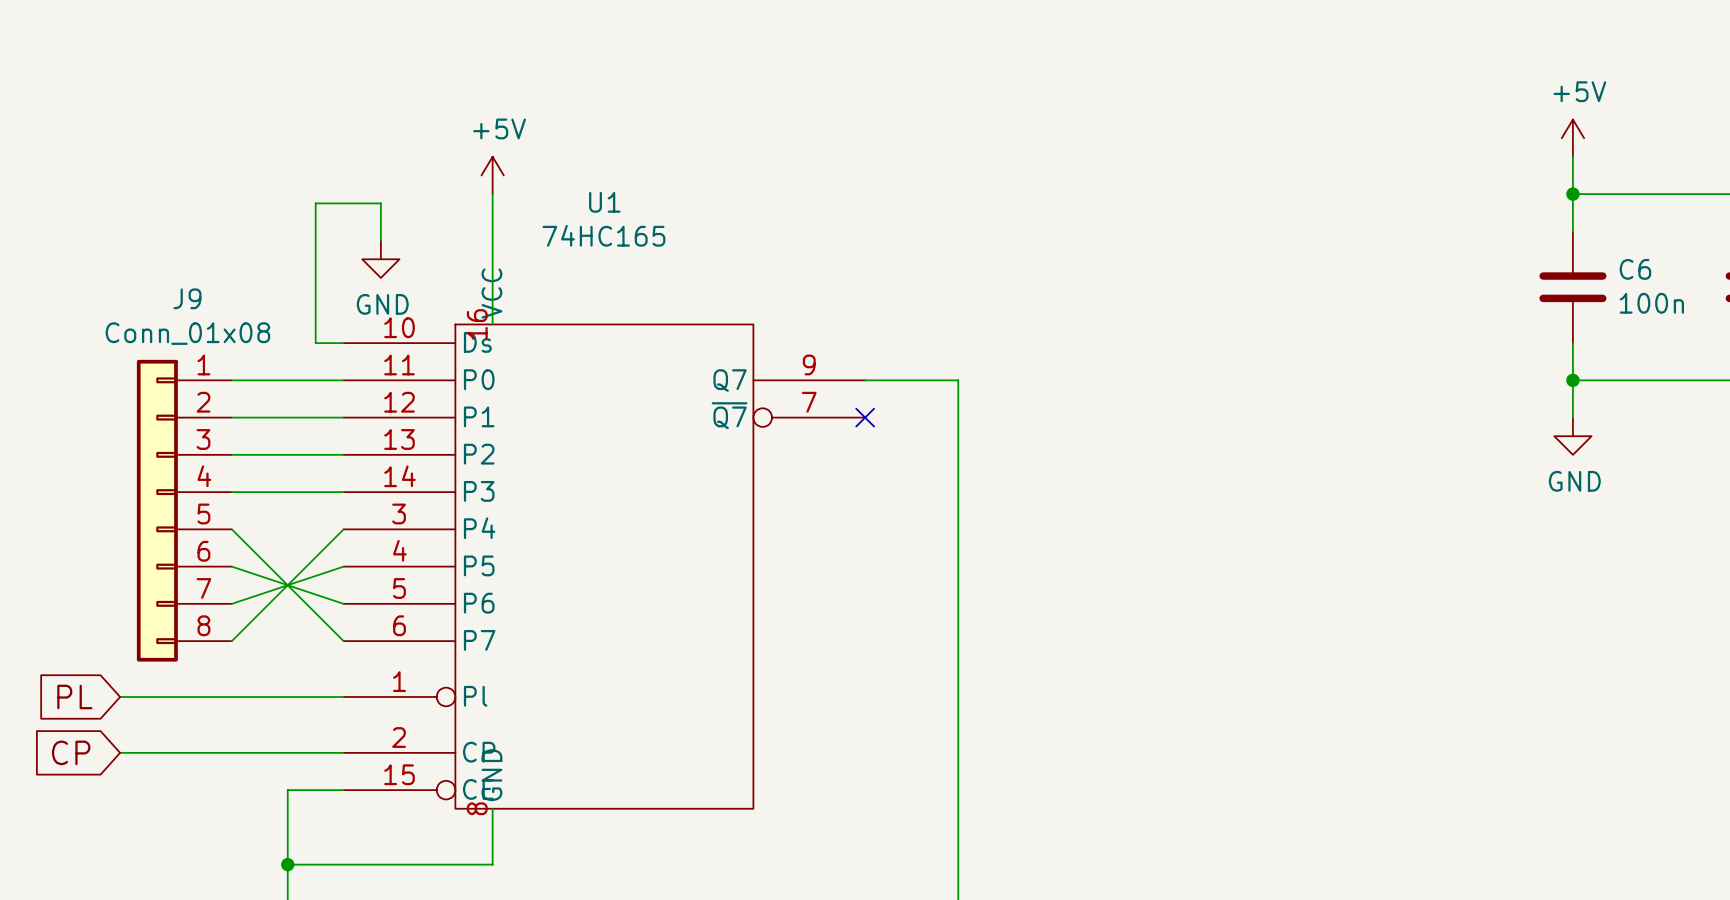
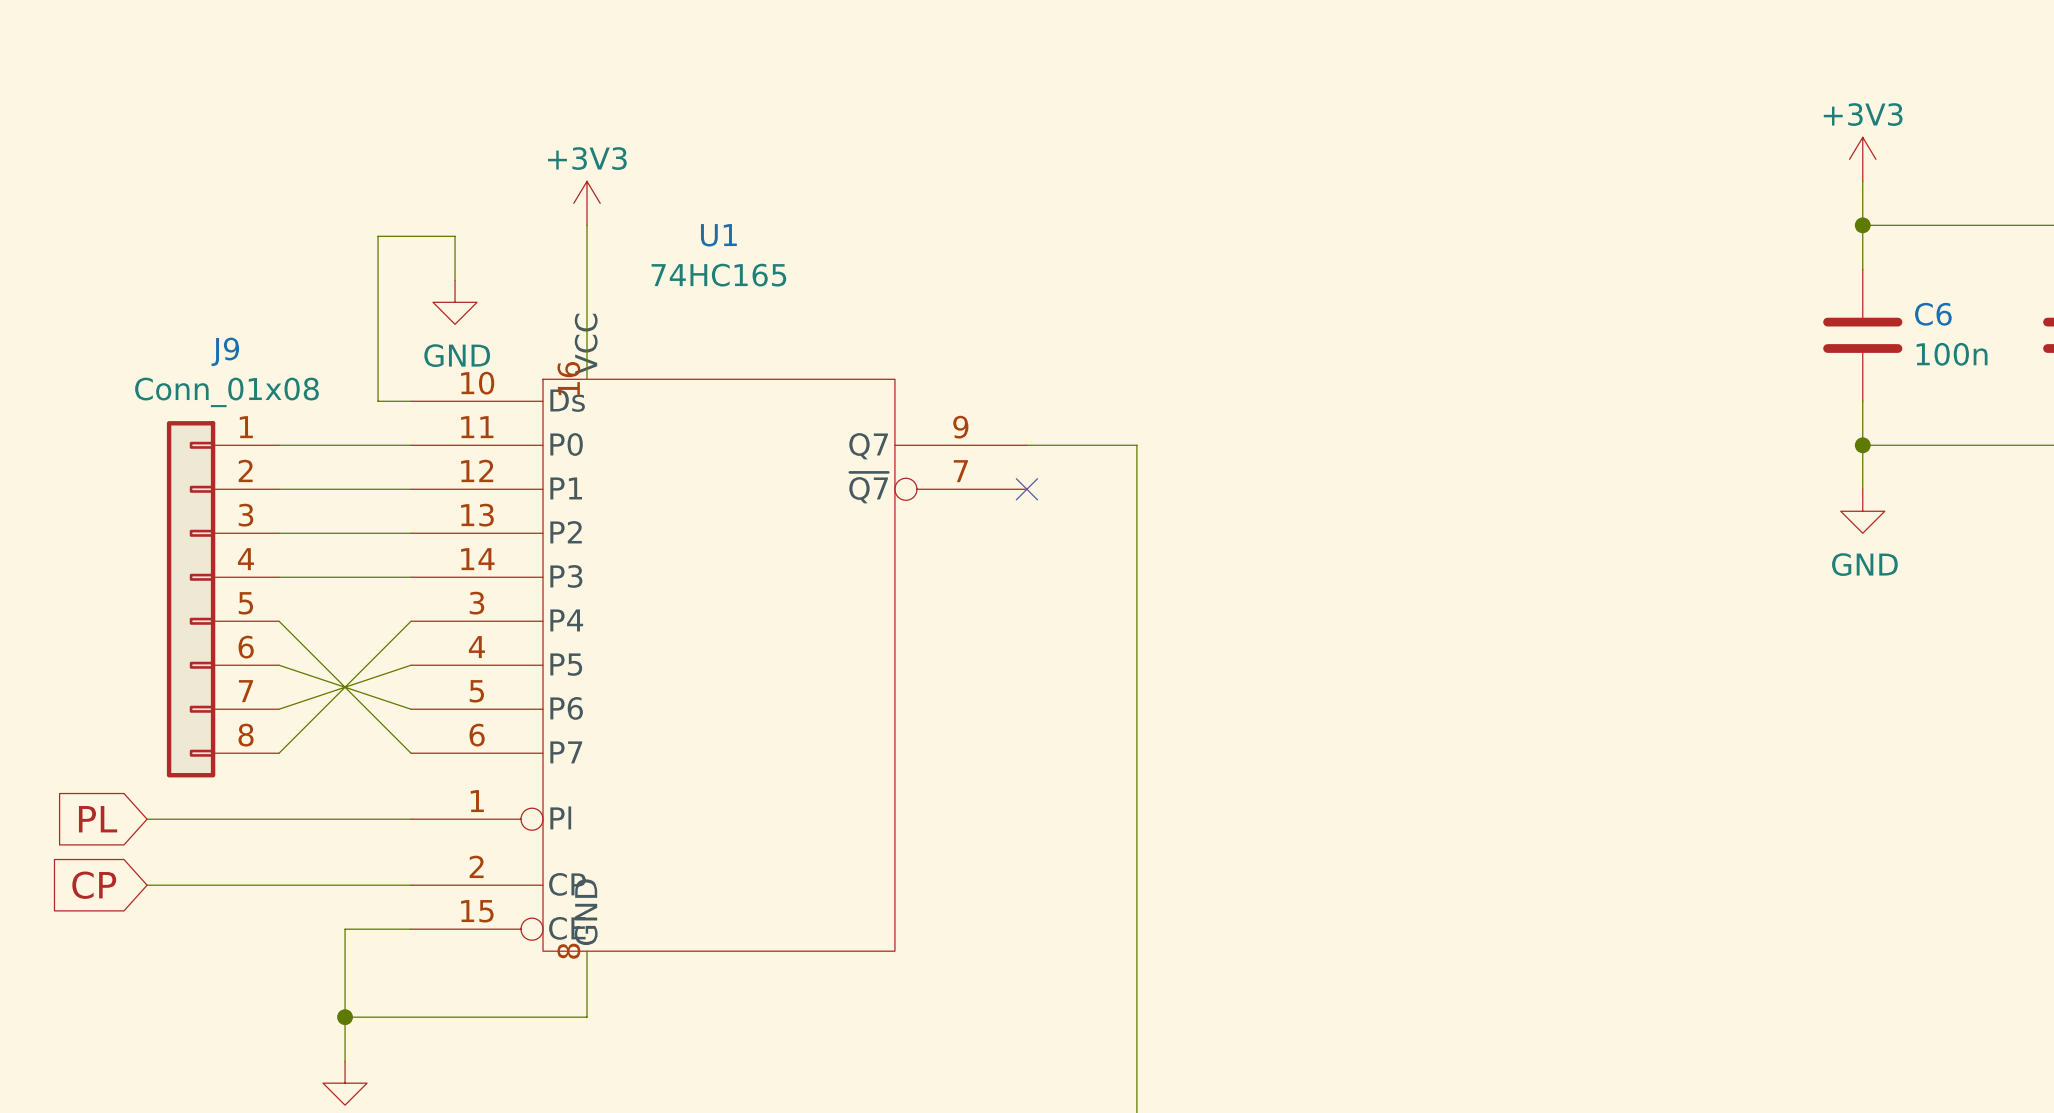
power symbol: +5V (1572, 138) -> +3V3 (1862, 159)
power symbol: +5V (492, 175) -> +3V3 (587, 203)

